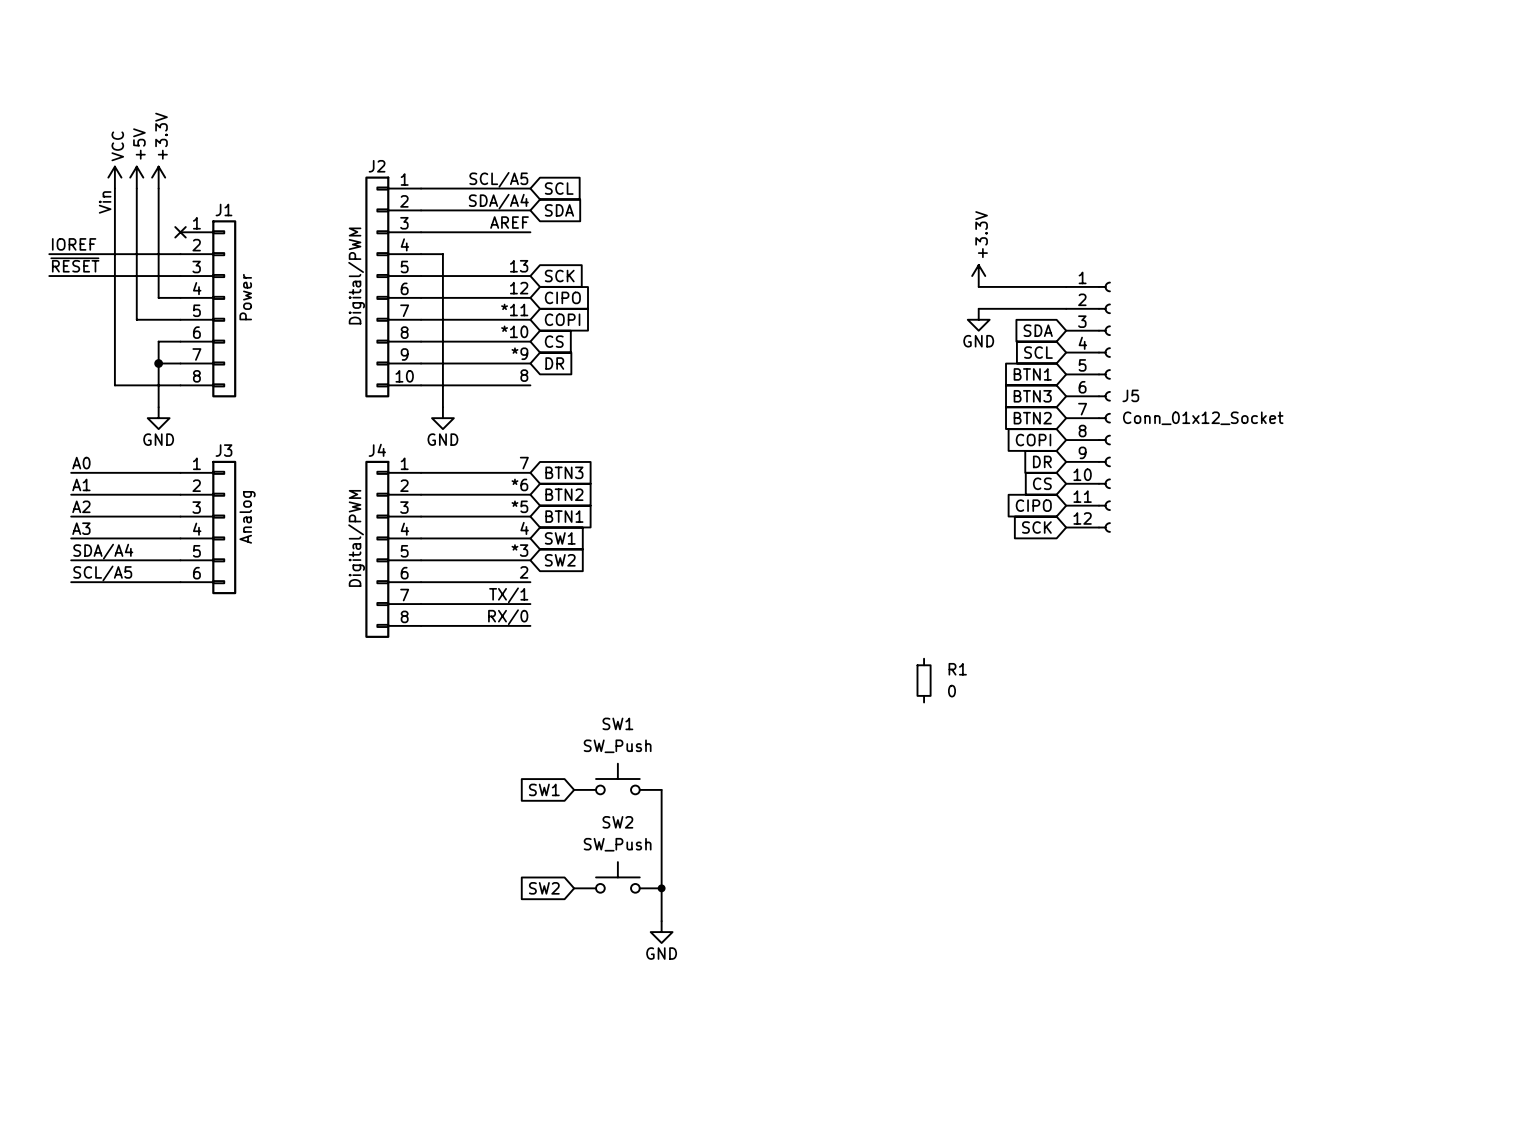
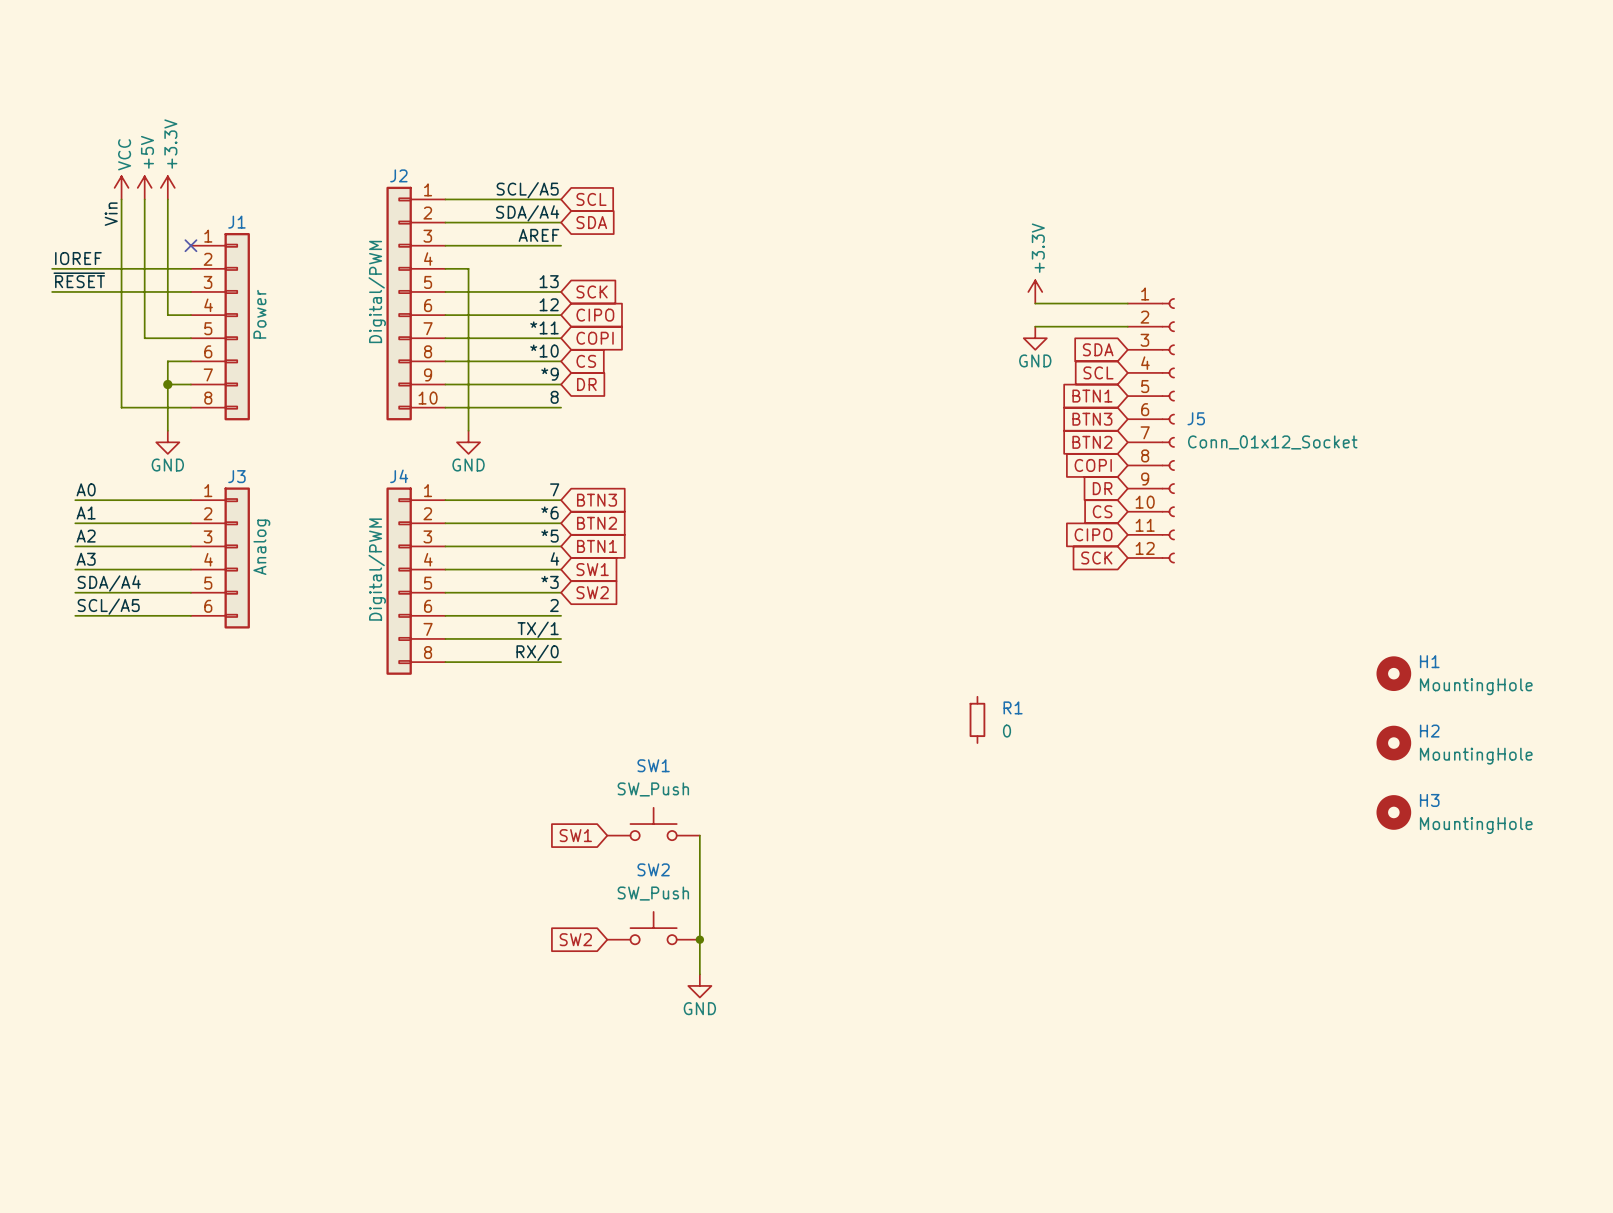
H1: none -> MountingHole (1393, 673)
H2: none -> MountingHole (1393, 743)
H3: none -> MountingHole (1393, 812)

